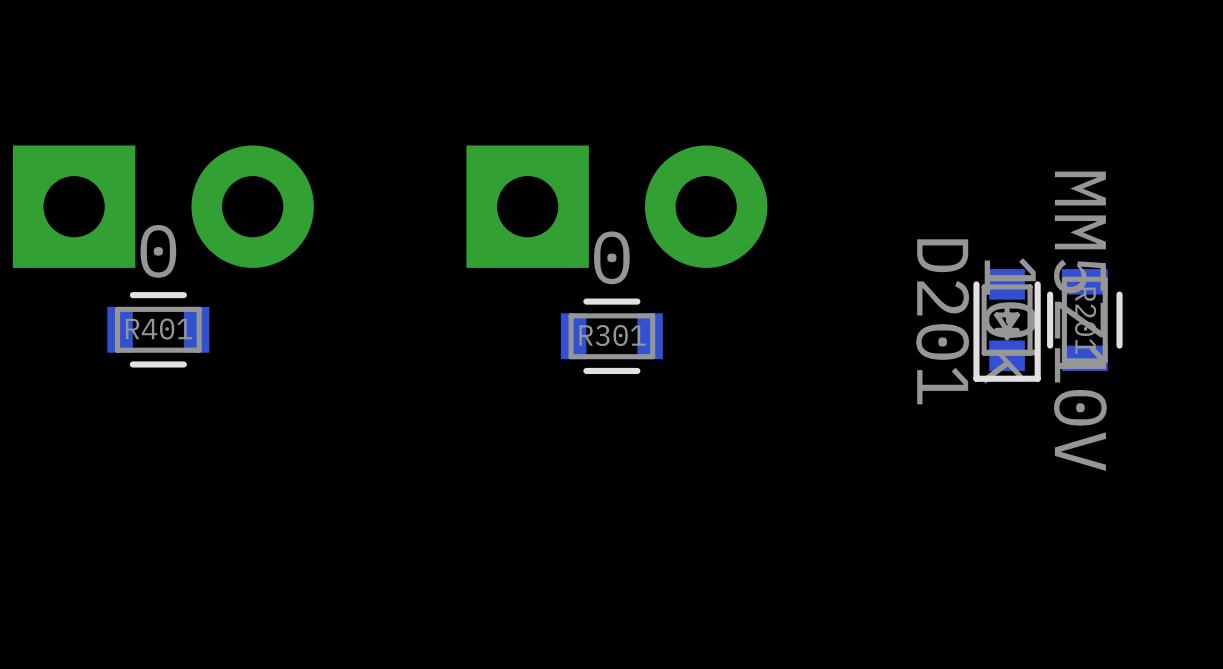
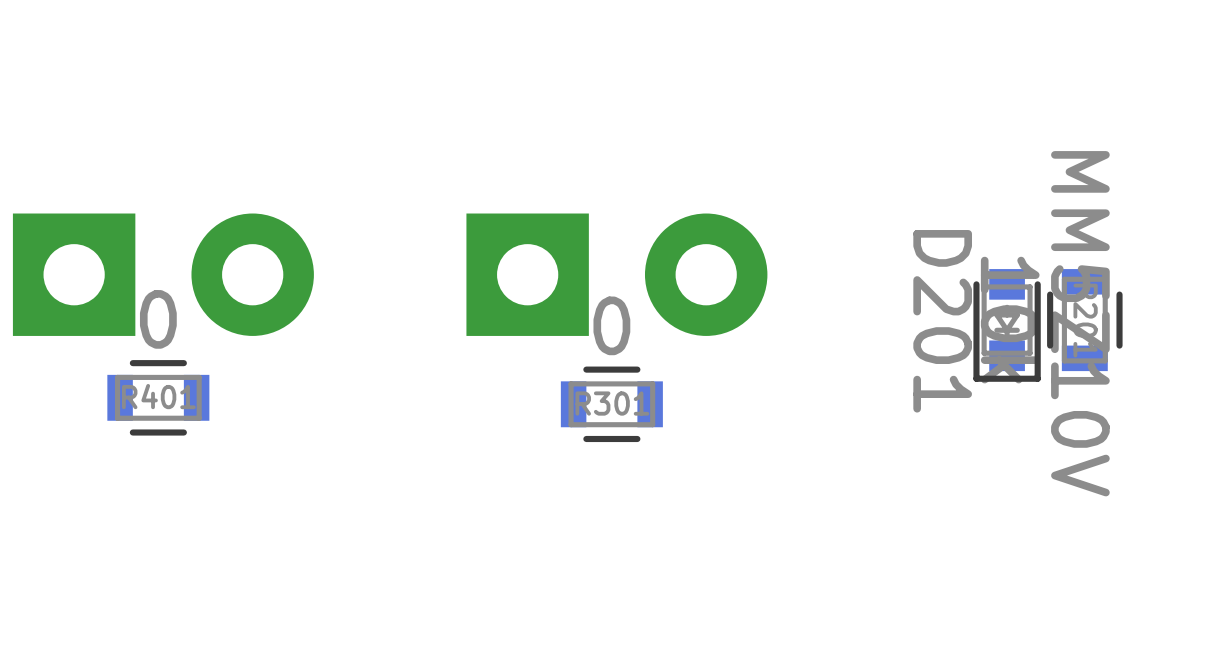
part position: (163, 206) -> (163, 274)
part position: (616, 206) -> (616, 274)
R401 position: (158, 329) -> (158, 397)
R301 position: (611, 336) -> (611, 404)

